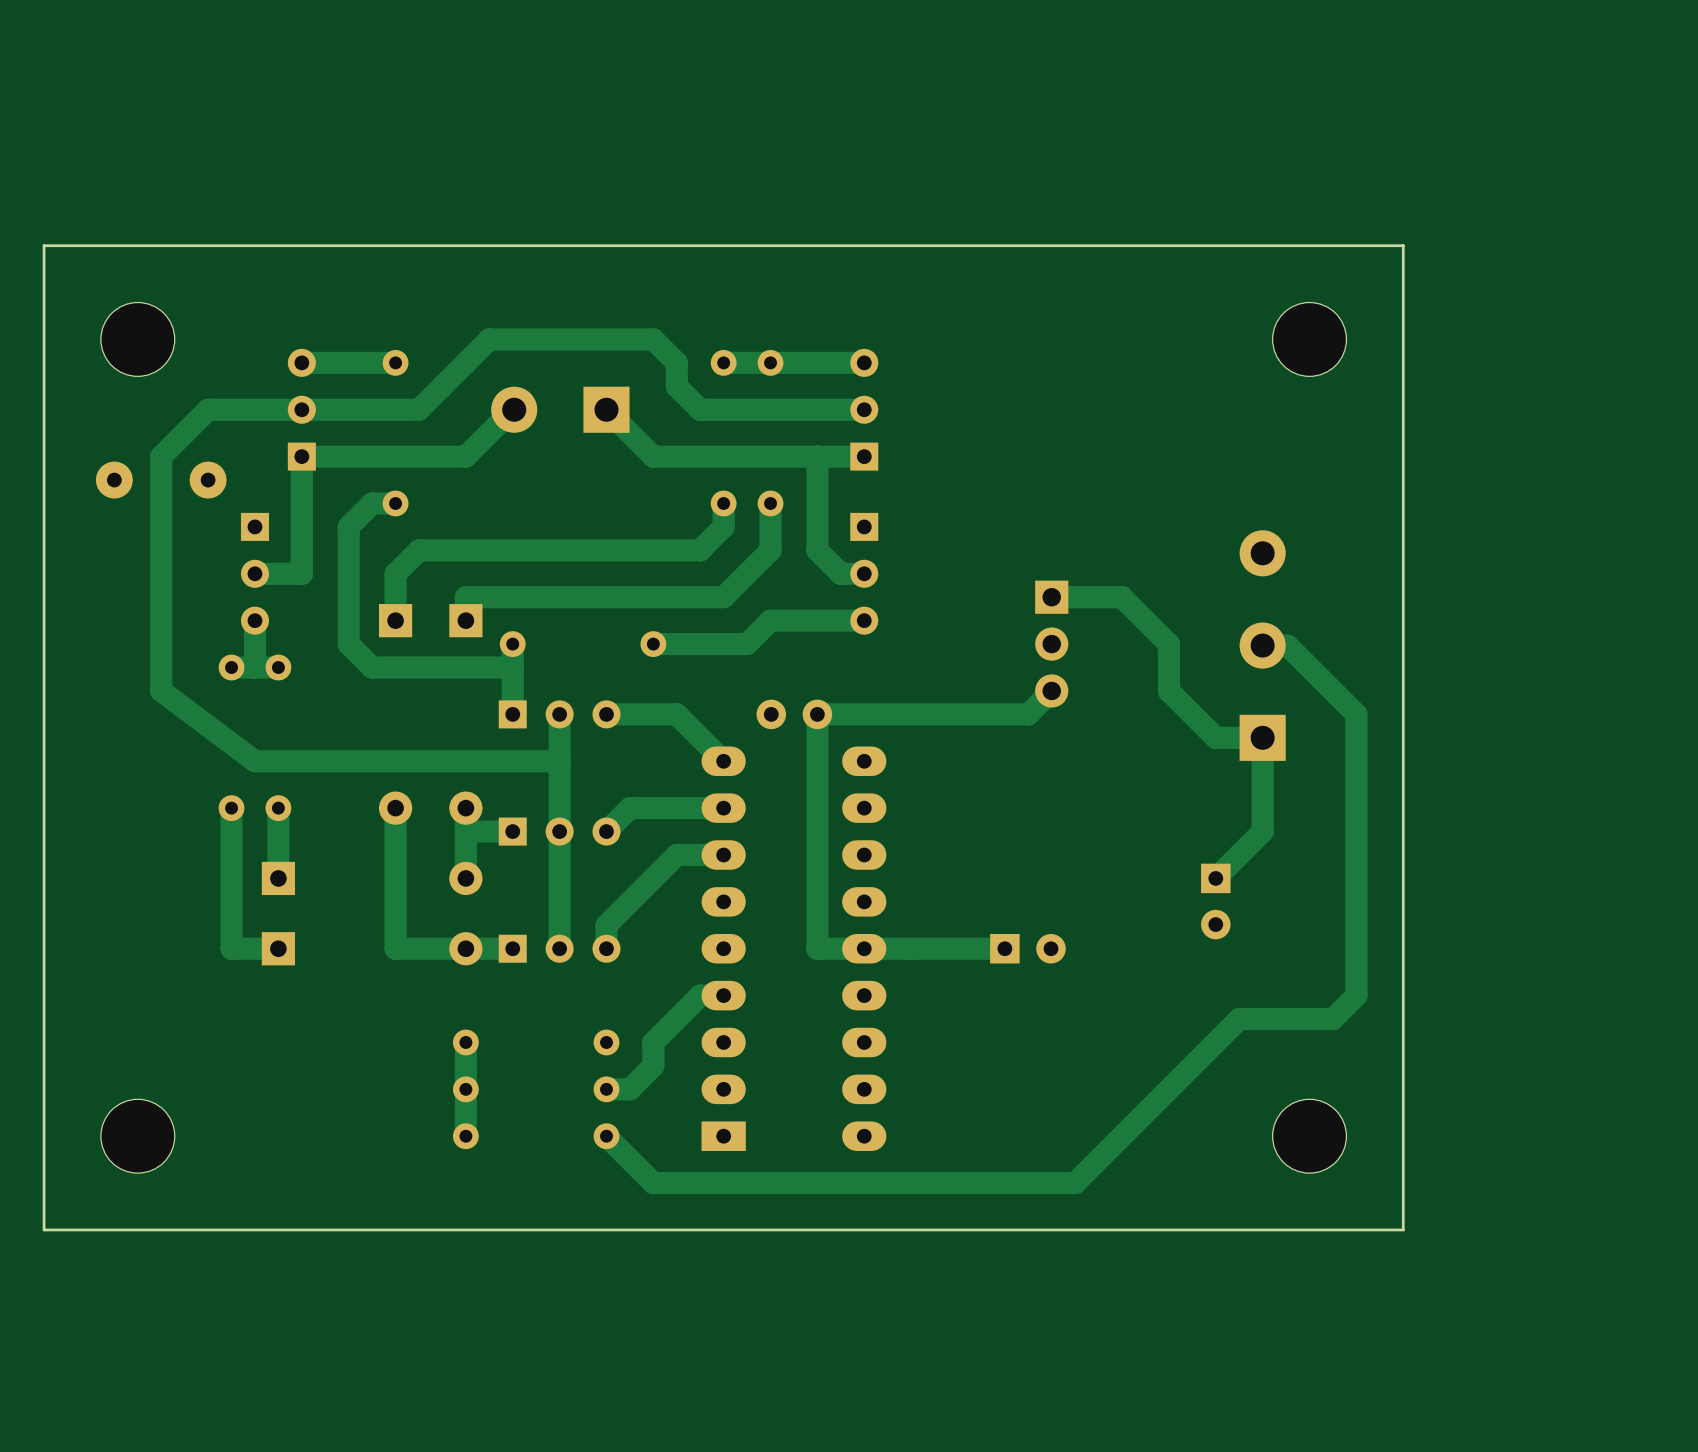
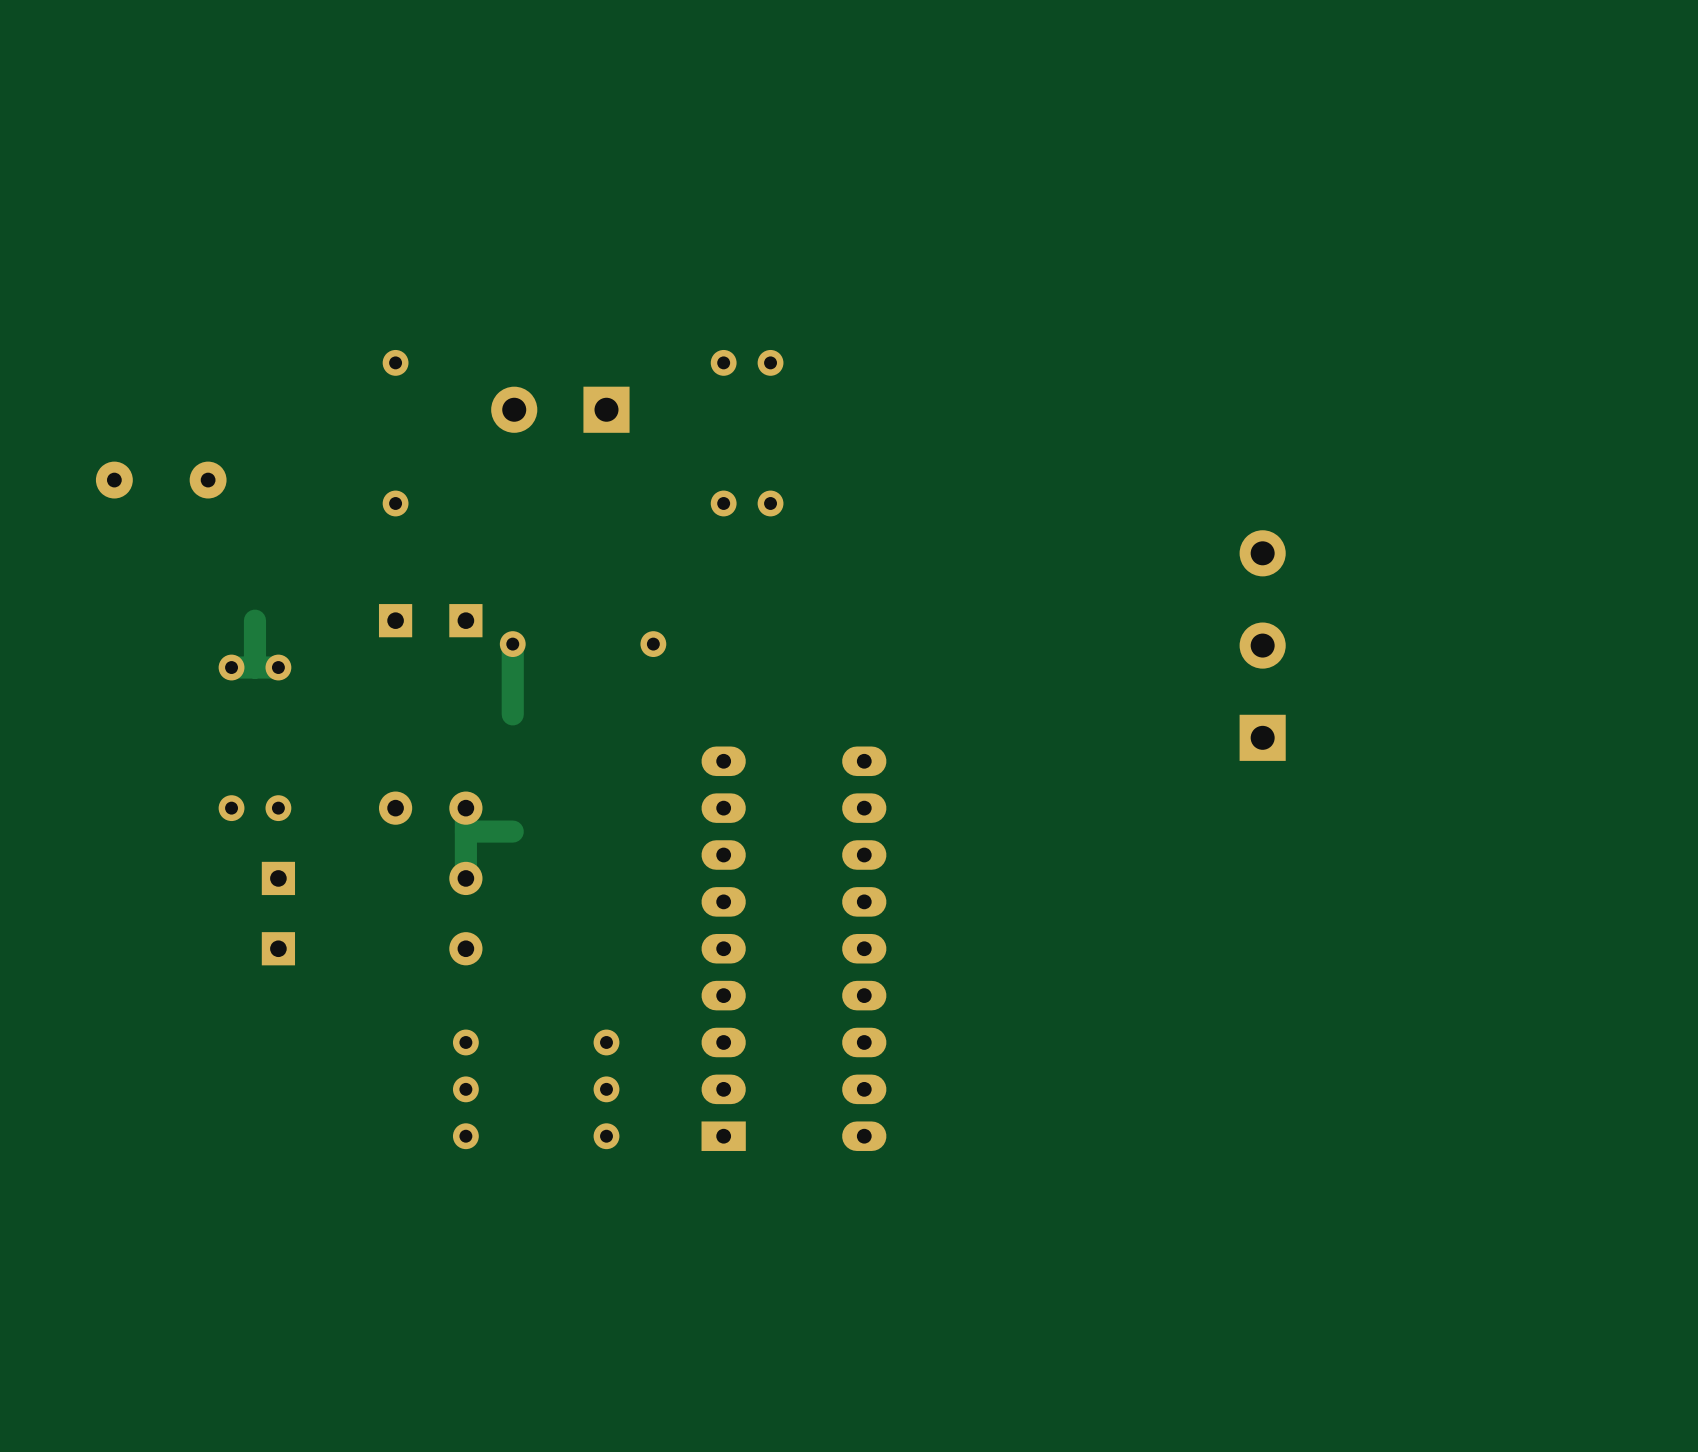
board edge: (1403, 245) (1403, 1229) (44, 1229) (44, 245) (1403, 245) -> none
part: (137, 339) -> none
part: (1309, 339) -> none
track: (395, 362) (301, 362) -> none
track: (864, 362) (723, 362) -> none
part: (301, 409) -> none
track: (514, 409) (465, 456) (301, 456) (301, 573) (254, 573) -> none
track: (606, 409) (653, 456) (864, 456) -> none
track: (864, 409) (700, 409) (676, 386) (676, 362) (653, 339) (489, 339) (419, 409) (208, 409) (161, 456) (161, 690) (254, 761) (559, 761) -> none
part: (864, 409) -> none
track: (817, 456) (817, 550) (840, 573) (864, 573) -> none
track: (395, 503) (372, 503) (348, 526) (348, 644) (372, 667) (512, 667) -> none
track: (723, 503) (723, 526) (700, 550) (419, 550) (395, 573) (395, 620) -> none
track: (770, 503) (770, 550) (723, 597) (465, 597) (465, 620) -> none
part: (254, 573) -> none
part: (864, 573) -> none
track: (1051, 597) (1122, 597) (1168, 644) (1168, 690) (1215, 737) (1262, 737) (1262, 831) (1215, 878) -> none
track: (864, 620) (770, 620) (747, 644) (653, 644) -> none
part: (1051, 644) -> none
track: (1262, 645) (1287, 645) (1356, 714) (1356, 995) (1332, 1019) (1239, 1019) (1075, 1183) (653, 1183) (606, 1136) -> none
track: (1051, 690) (1028, 714) (817, 714) (817, 948) (1004, 948) -> none
track: (559, 714) (559, 948) -> none
part: (559, 714) -> none
track: (606, 714) (676, 714) (723, 761) -> none
part: (794, 714) -> none
track: (231, 808) (231, 948) (278, 948) -> none
track: (278, 808) (278, 878) -> none
track: (395, 808) (395, 948) (512, 948) -> none
track: (723, 808) (629, 808) (606, 831) -> none
part: (559, 831) -> none
track: (723, 855) (676, 855) (606, 925) (606, 948) -> none
part: (1215, 901) -> none
part: (559, 948) -> none
part: (1027, 948) -> none
track: (723, 995) (700, 995) (653, 1042) (653, 1065) (629, 1089) (606, 1089) -> none
track: (465, 1042) (465, 1136) -> none
part: (137, 1136) -> none
part: (1309, 1136) -> none

